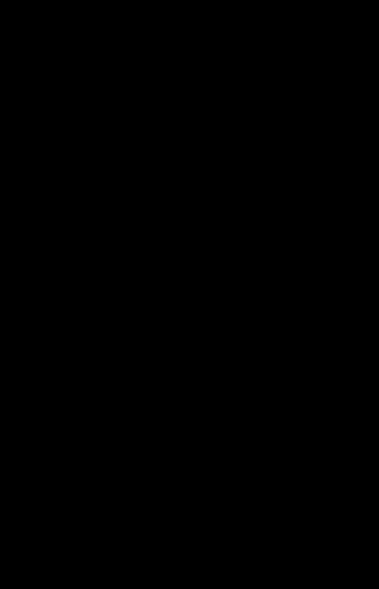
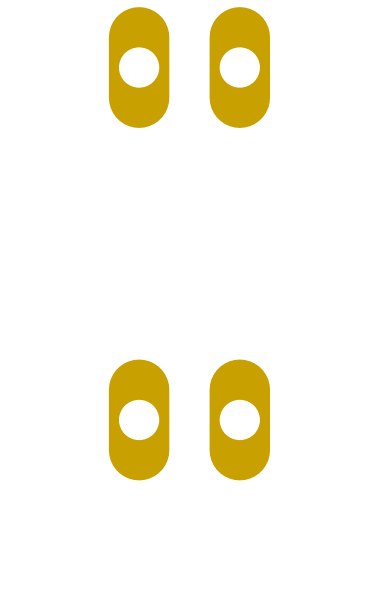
part: none -> (189, 67)
part: none -> (189, 419)

